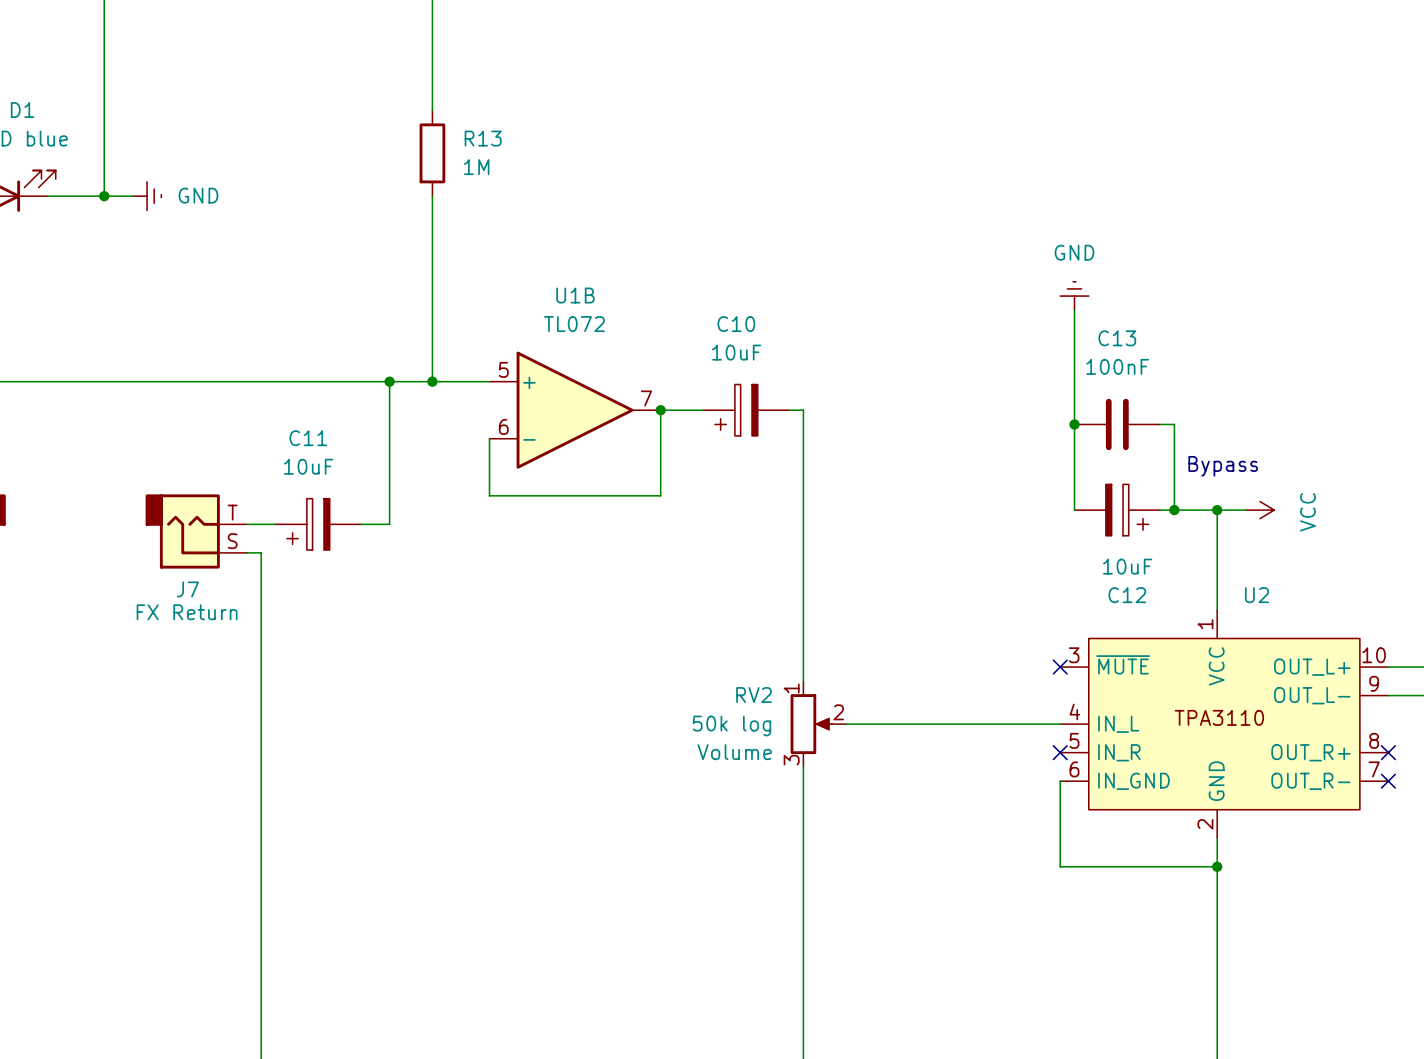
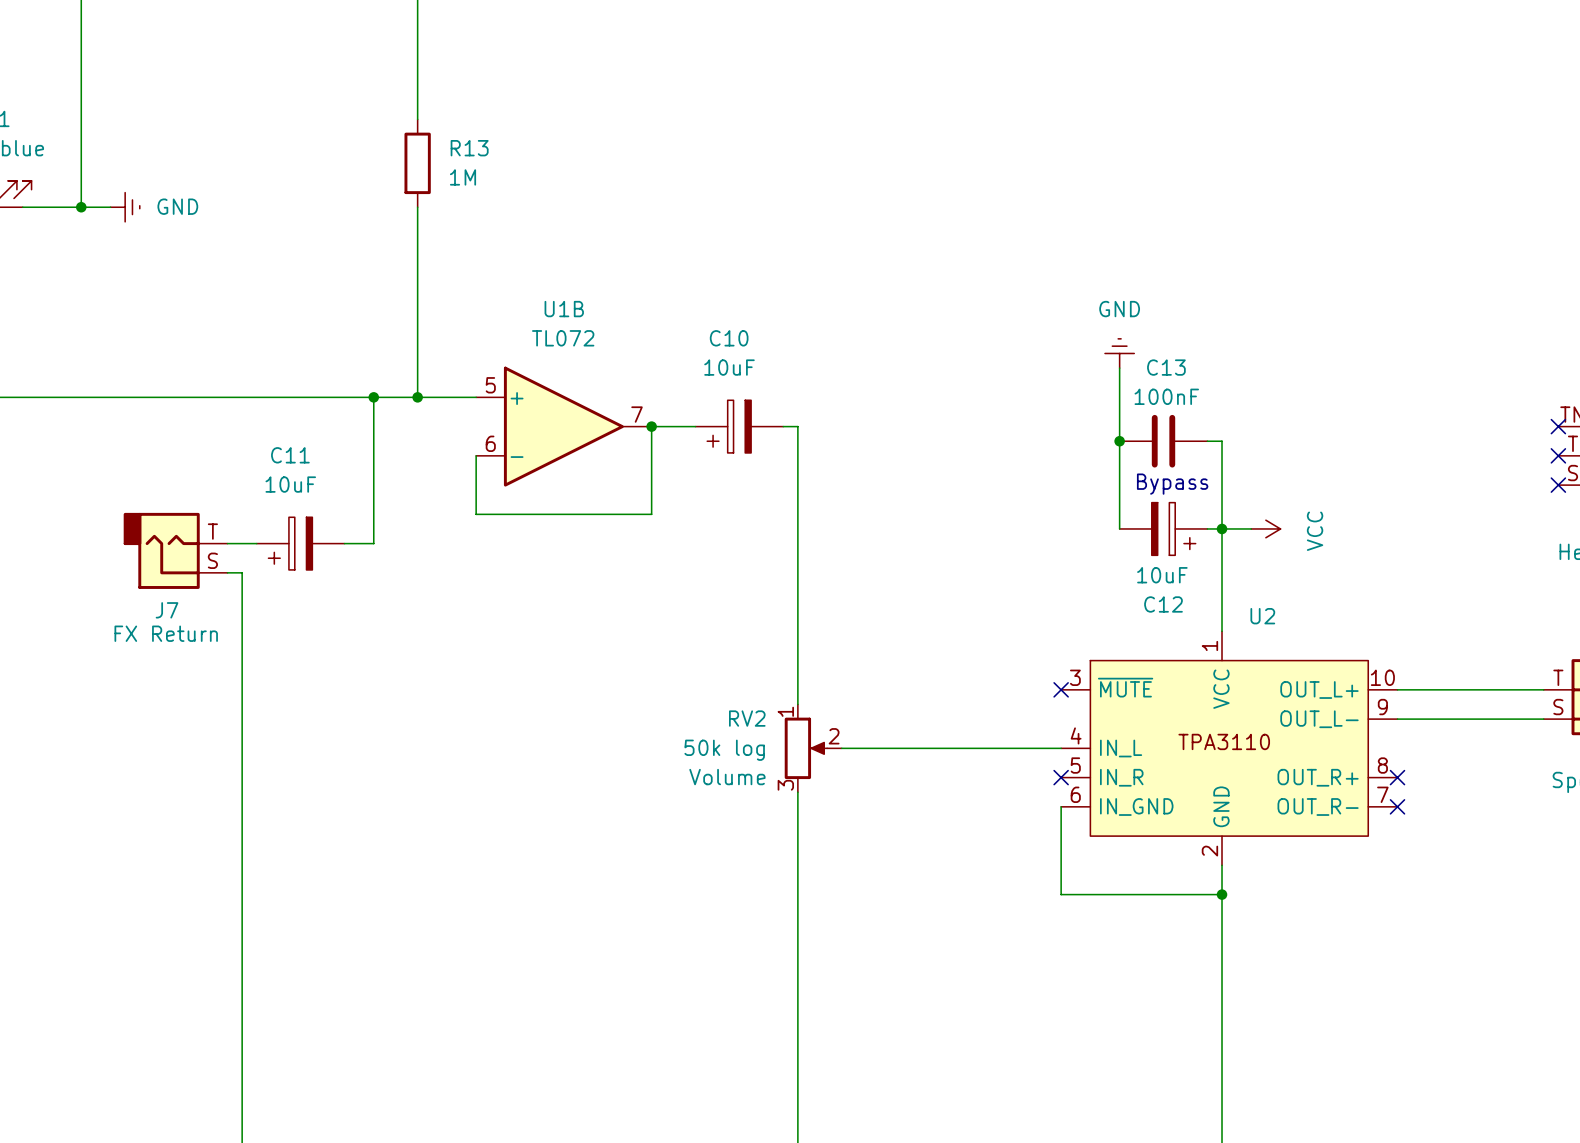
power symbol position: GND (1074, 296) -> GND (1119, 353)
wire: (1074, 310) (1074, 510) -> none
C13 name position: C13 (1117, 338) -> C13 (1166, 367)
wire: none -> (1119, 368) (1119, 528)
C13 value position: 100nF (1117, 366) -> 100nF (1166, 396)
junction position: (1074, 424) -> (1119, 441)
C13 position: (1117, 424) -> (1163, 441)
wire: (1160, 424) (1174, 424) (1174, 510) -> (1207, 441) (1222, 441) (1222, 528)
text position: Bypass (1223, 466) -> Bypass (1172, 484)
C12 position: (1117, 510) -> (1163, 528)
junction: (1174, 510) -> none
C12 value position: 10uF (1127, 566) -> 10uF (1162, 575)
C12 name position: C12 (1127, 595) -> C12 (1163, 604)

